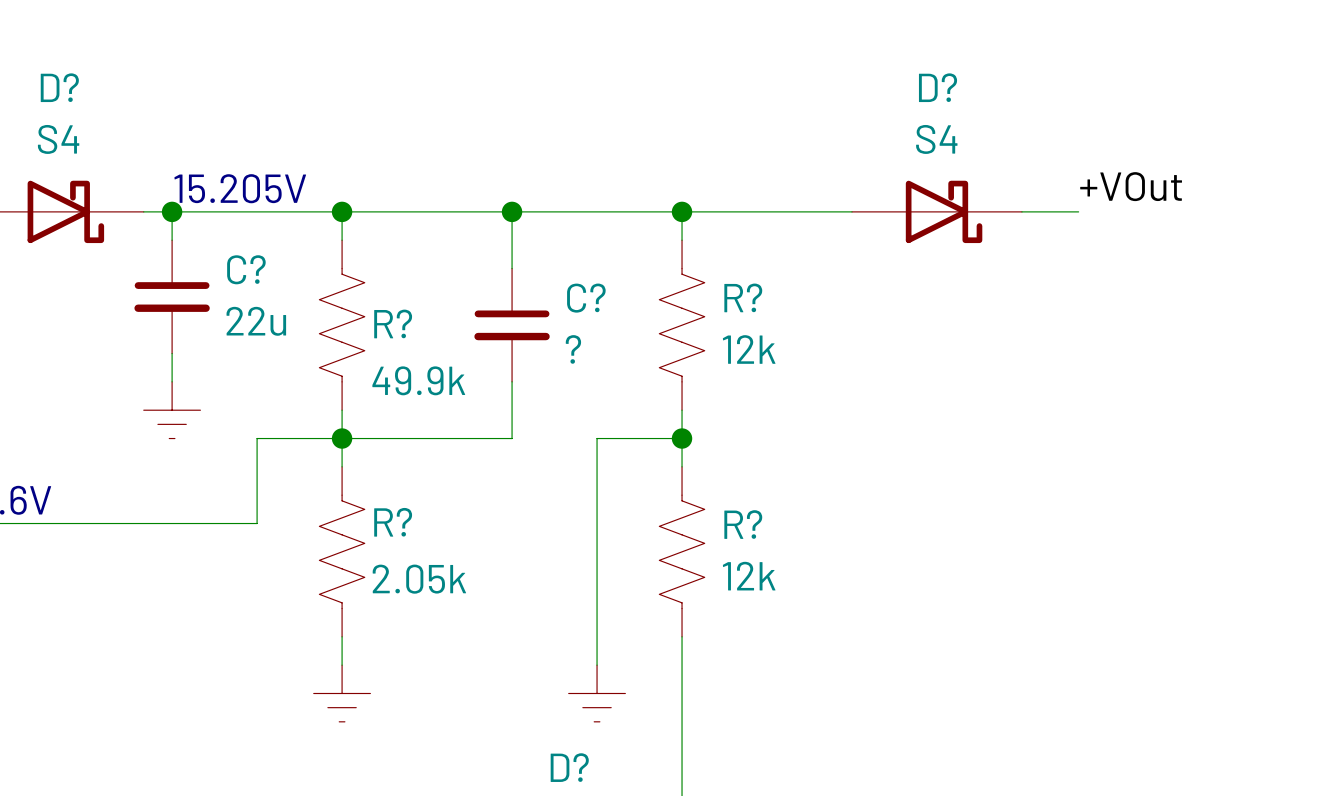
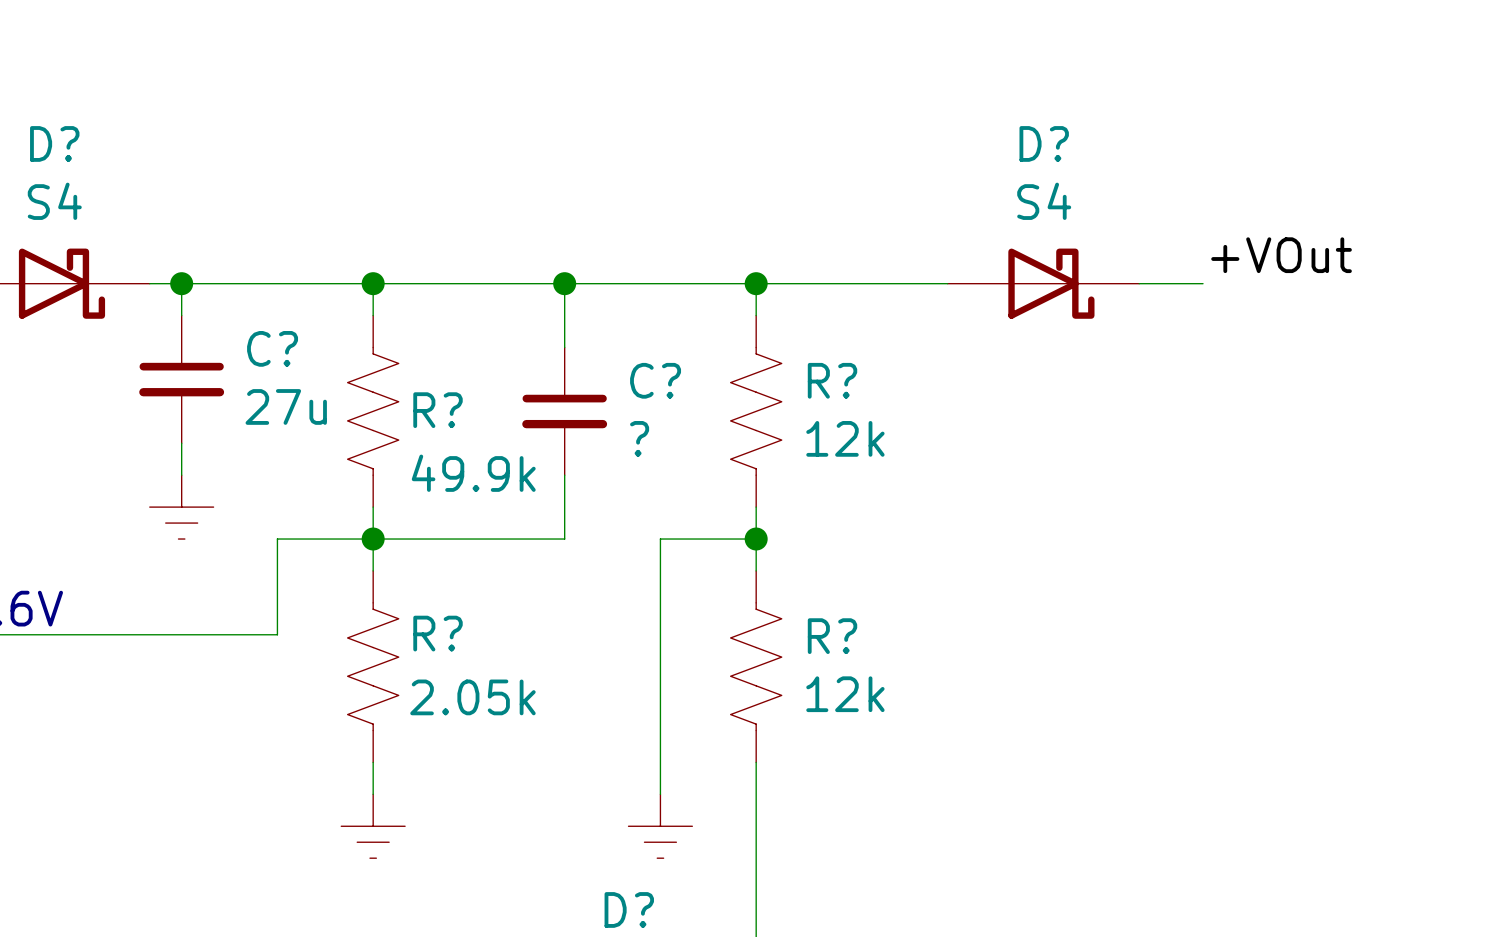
text: 15.205V (240, 188) -> none
C? value: 22u (256, 321) -> 27u (286, 406)

